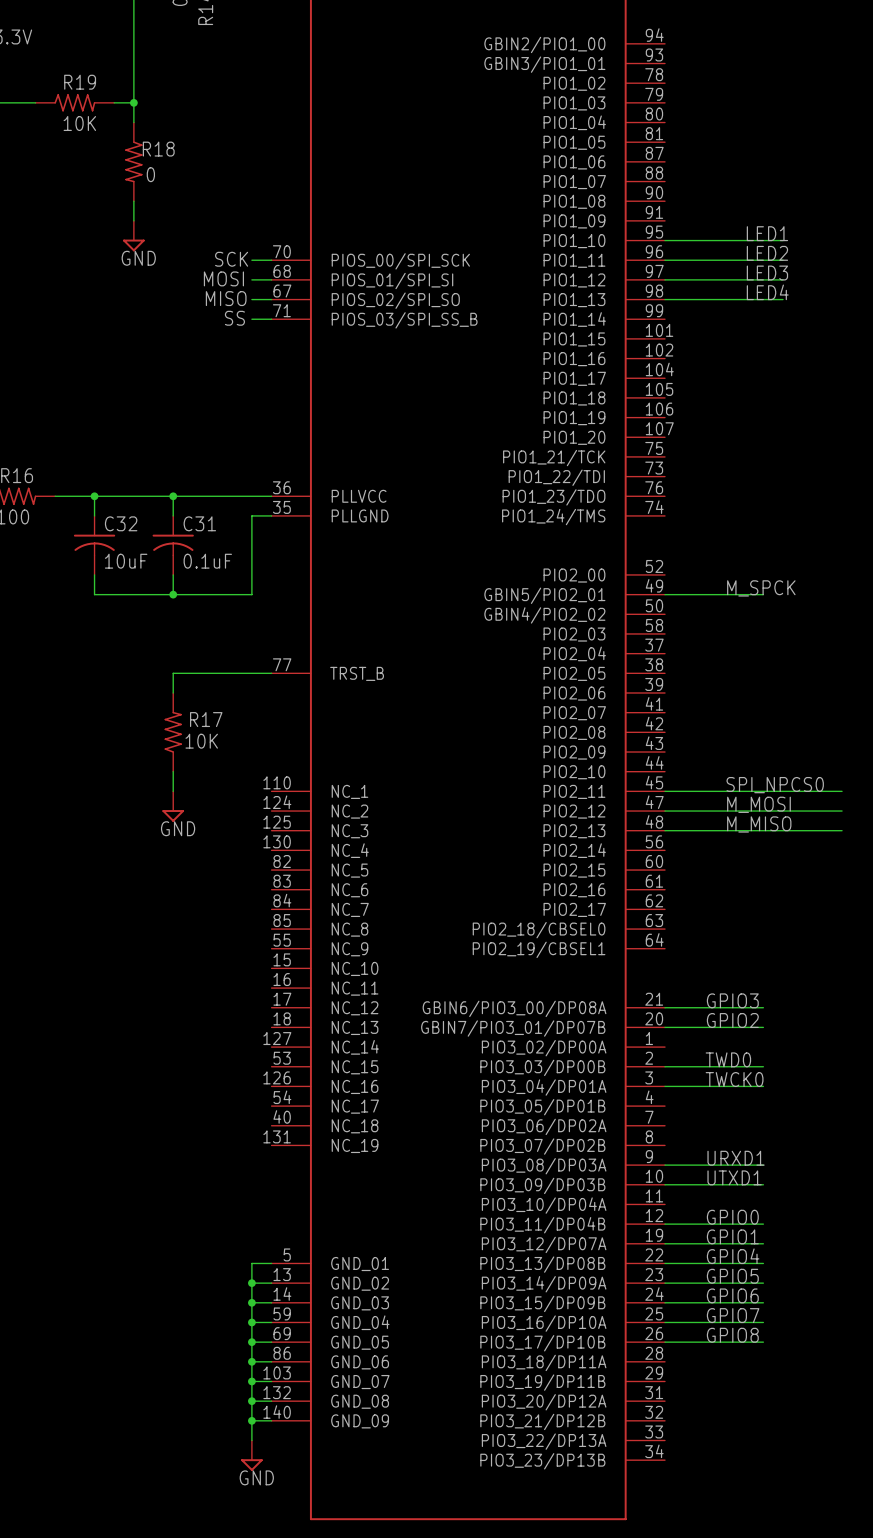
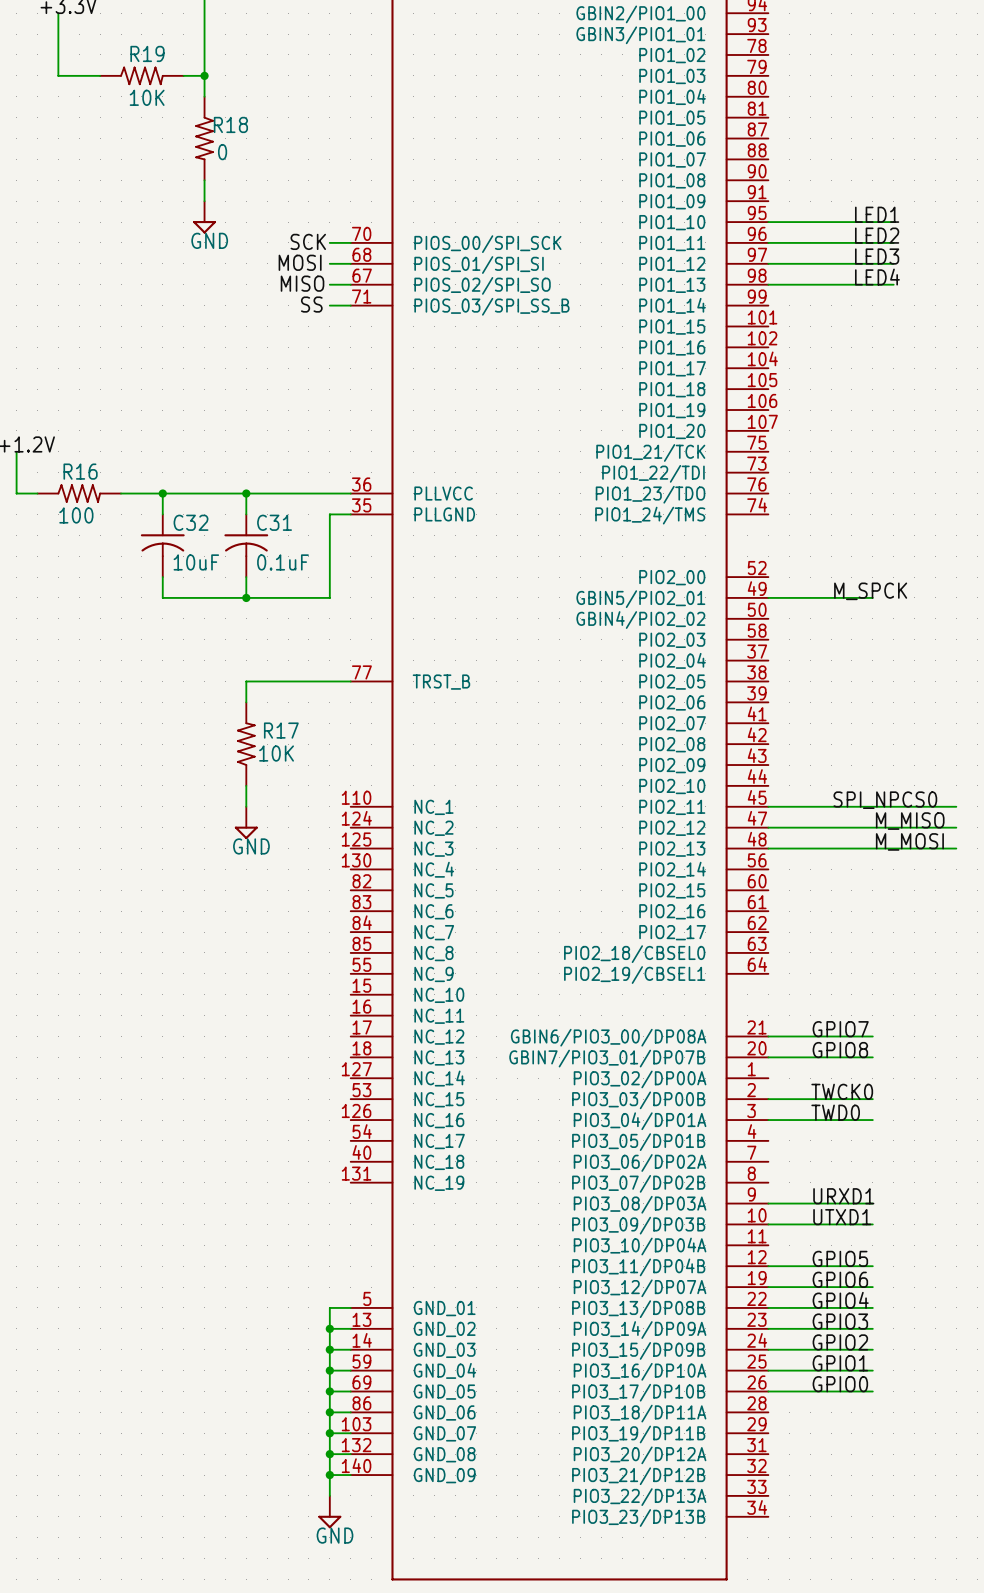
label position: M_MOSI (758, 804) -> M_MOSI (909, 841)
label position: M_MISO (759, 824) -> M_MISO (910, 821)
label: GPIO3 (732, 1000) -> GPIO7 (840, 1029)
label: GPIO2 (732, 1020) -> GPIO8 (840, 1050)
label: TWD0 (728, 1059) -> TWCK0 (842, 1091)
label: TWCK0 (734, 1079) -> TWD0 (835, 1112)
label: GPIO0 (732, 1217) -> GPIO5 (840, 1258)
label: GPIO1 (732, 1236) -> GPIO6 (840, 1279)
label: GPIO5 (732, 1276) -> GPIO3 (840, 1321)
label: GPIO6 (732, 1295) -> GPIO2 (840, 1342)
label: GPIO7 (733, 1315) -> GPIO1 (840, 1363)
label: GPIO8 (732, 1335) -> GPIO0 (840, 1384)

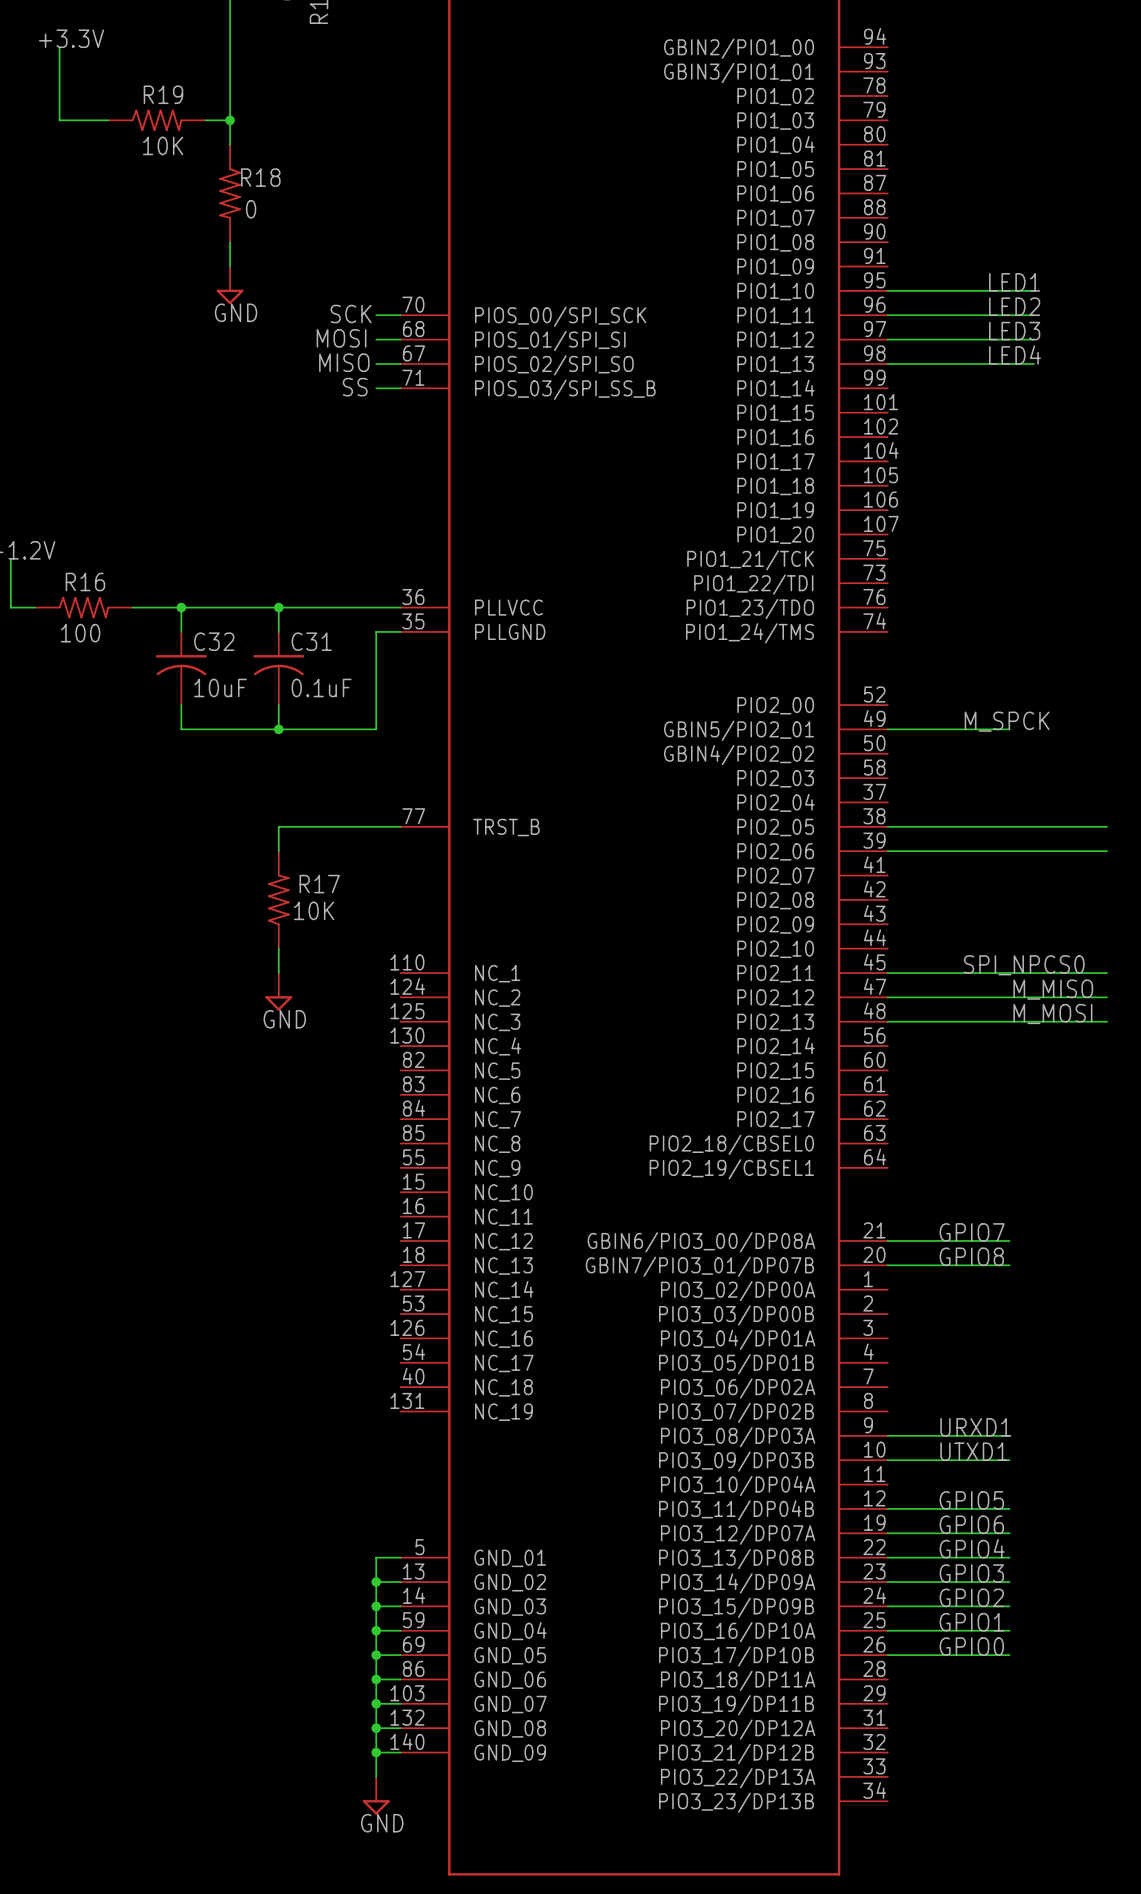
wire: none -> (887, 826) (1107, 826)
wire: none -> (887, 851) (1107, 851)
label: TWCK0 (842, 1091) -> none
wire: (768, 1099) (872, 1099) -> none
label: TWD0 (835, 1112) -> none
wire: (768, 1120) (872, 1120) -> none

